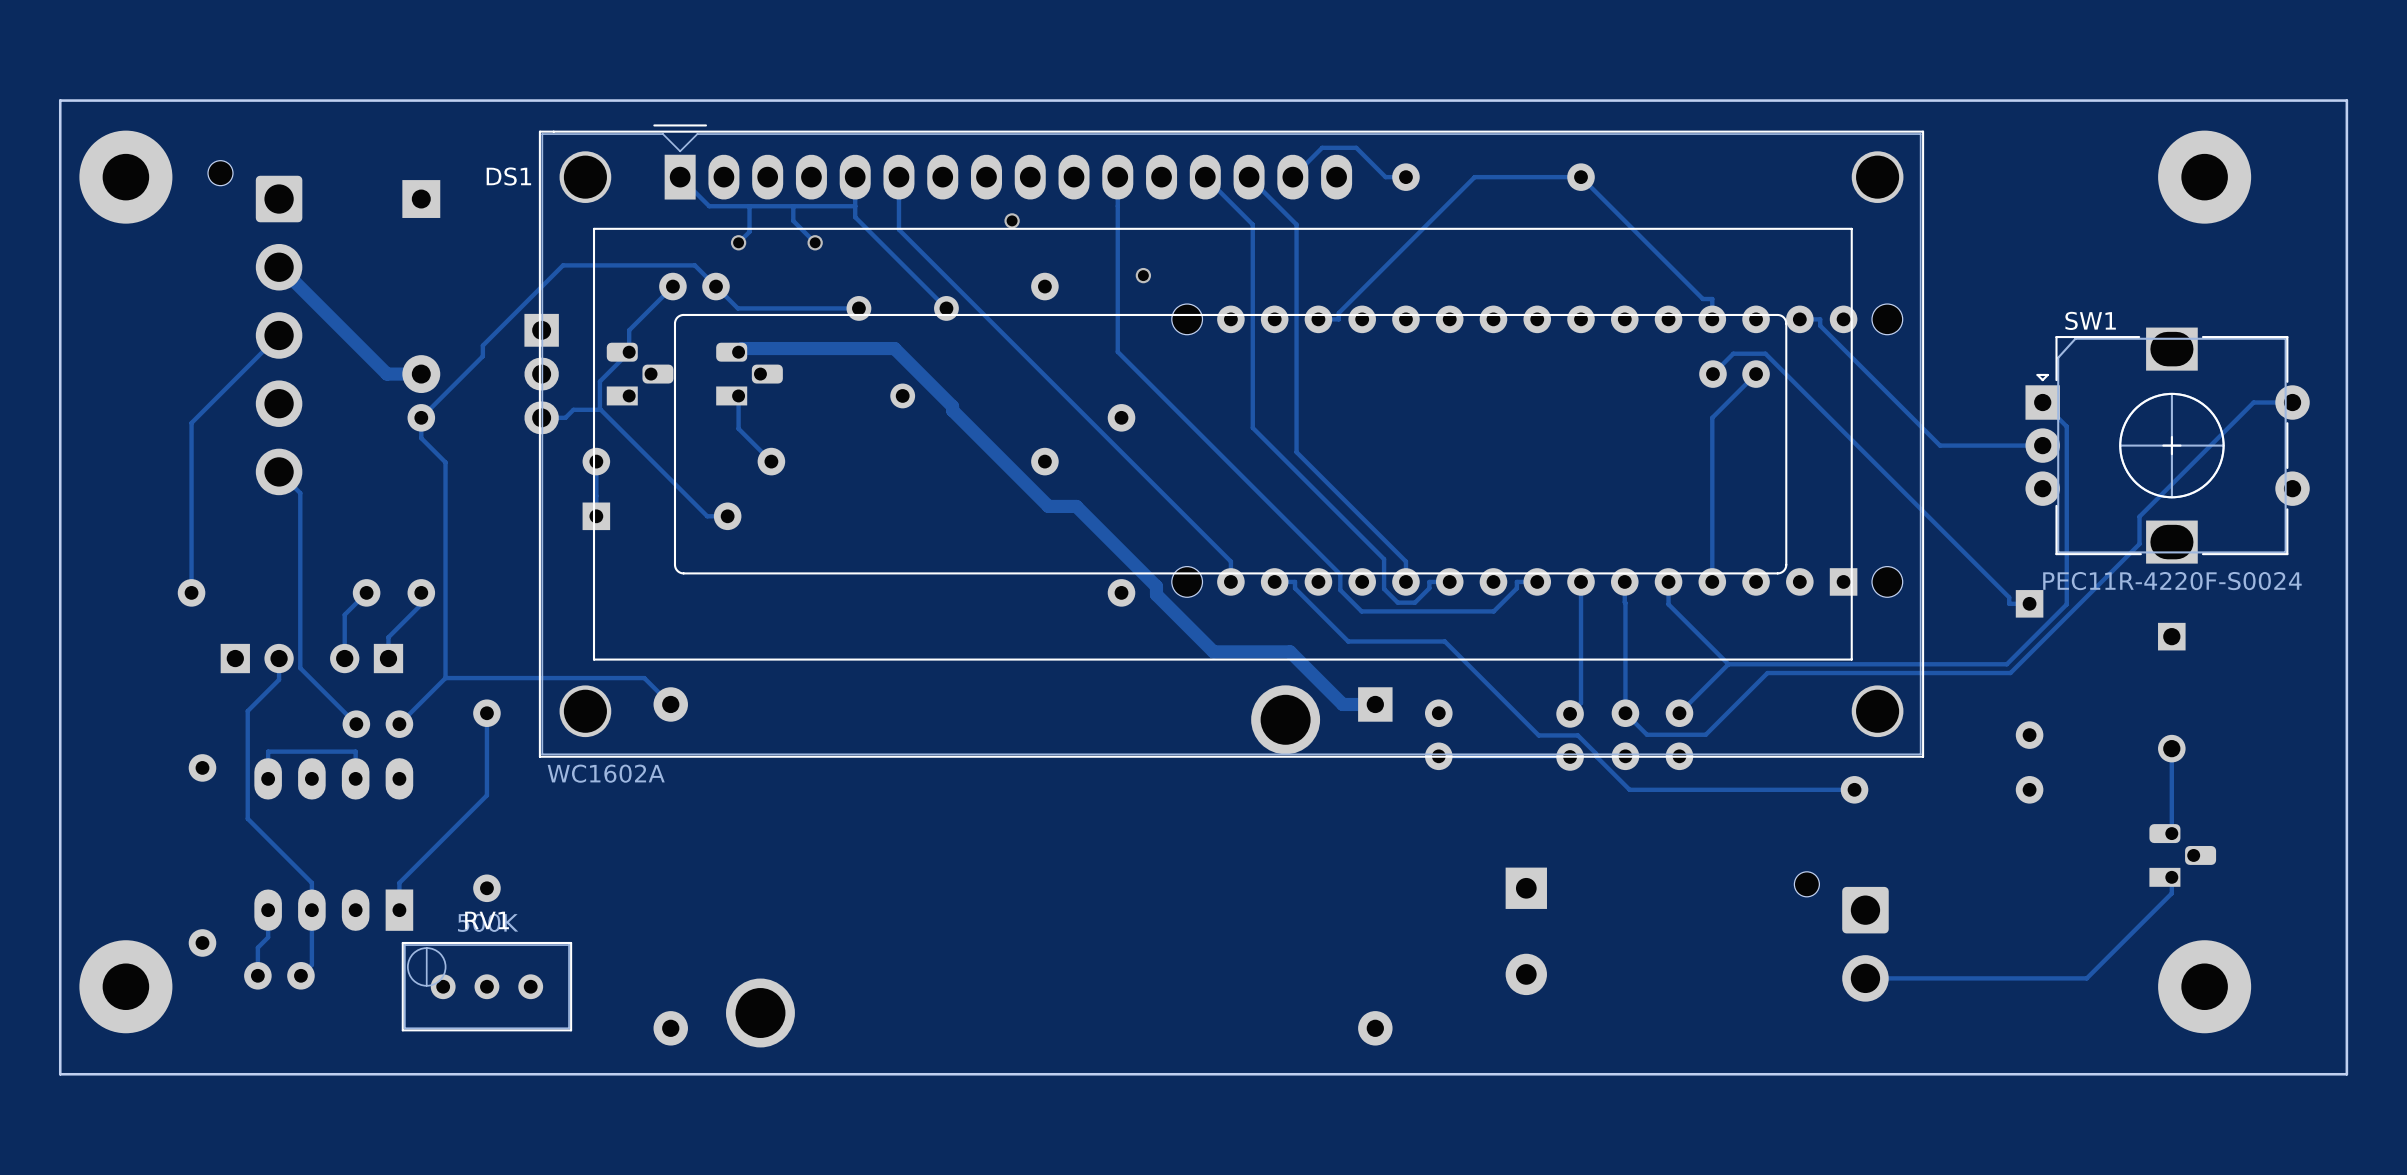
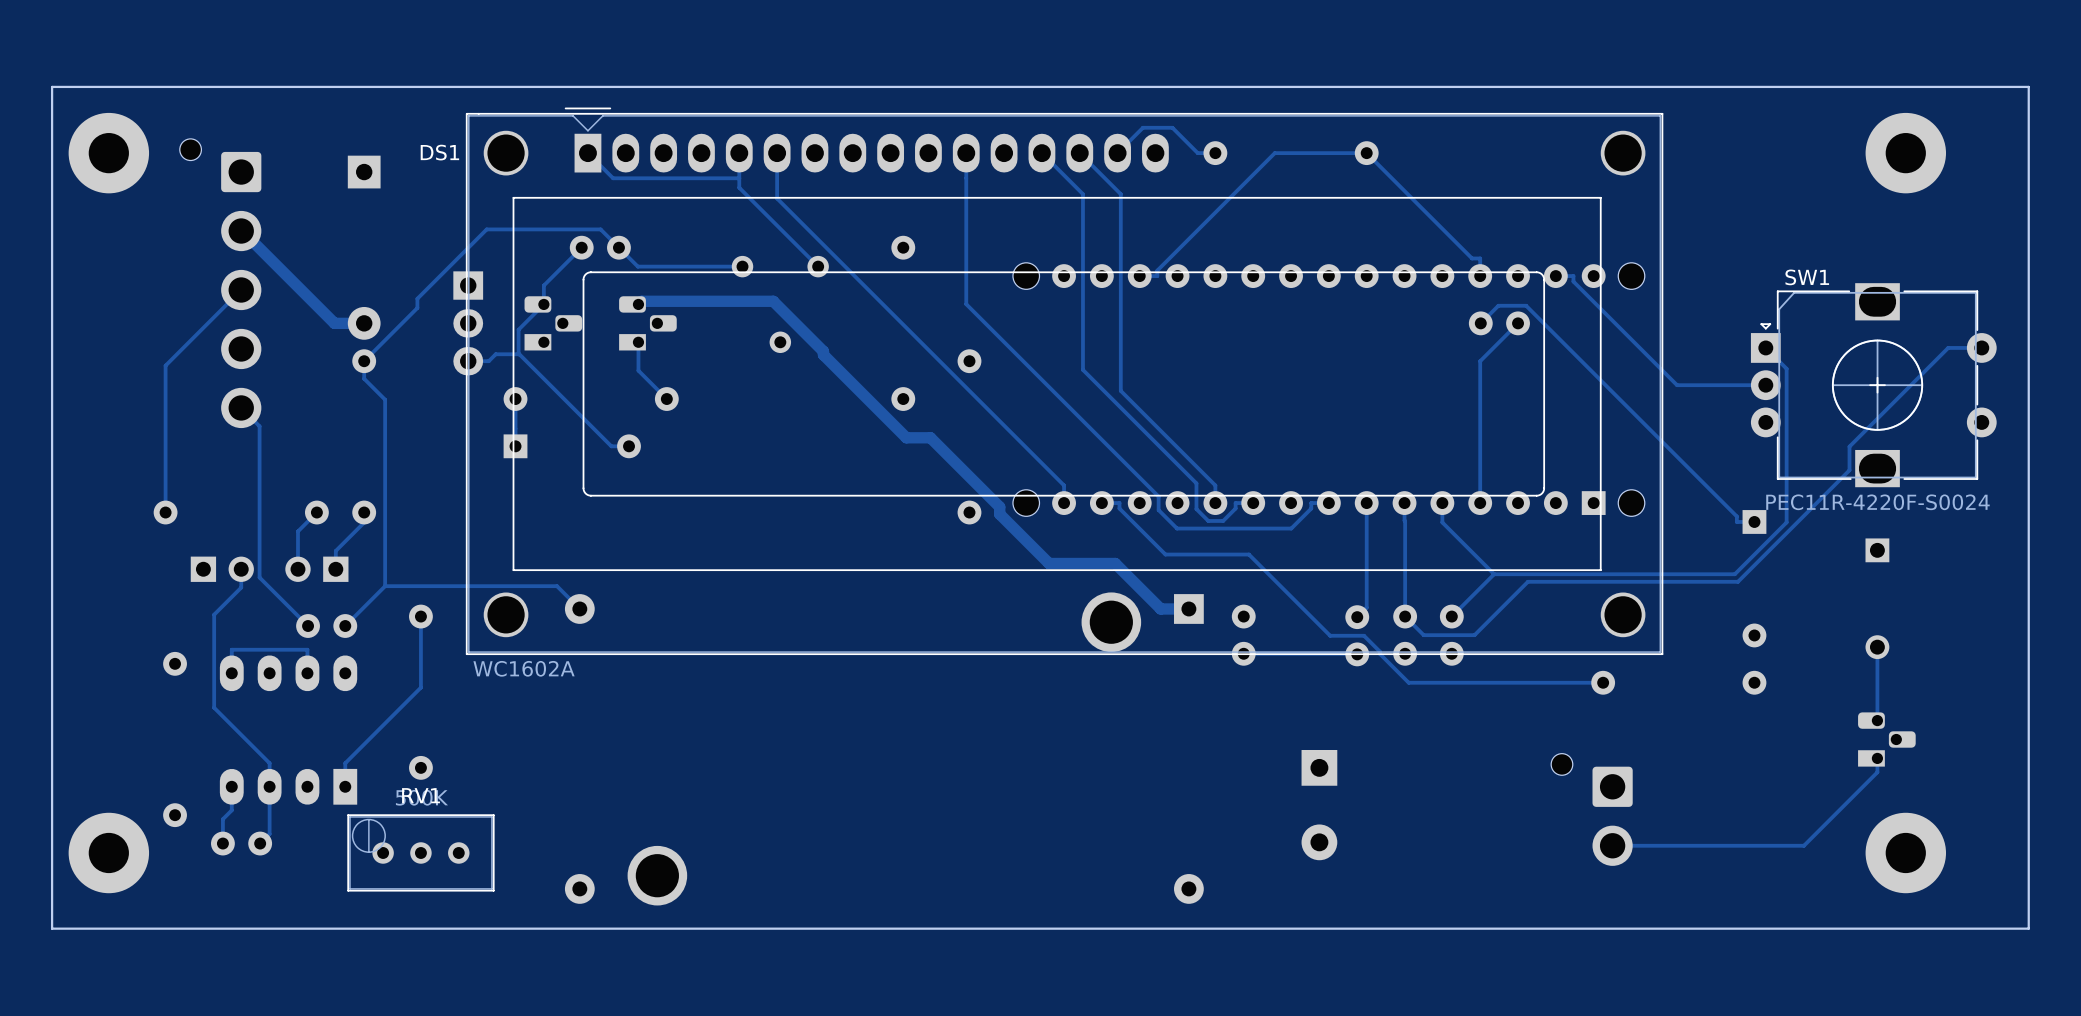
track: (749, 206) (749, 231) (738, 242) -> none
track: (793, 206) (793, 220) (815, 242) -> none
via: (1012, 220) -> none
via: (738, 242) -> none
via: (815, 242) -> none
via: (1143, 275) -> none

